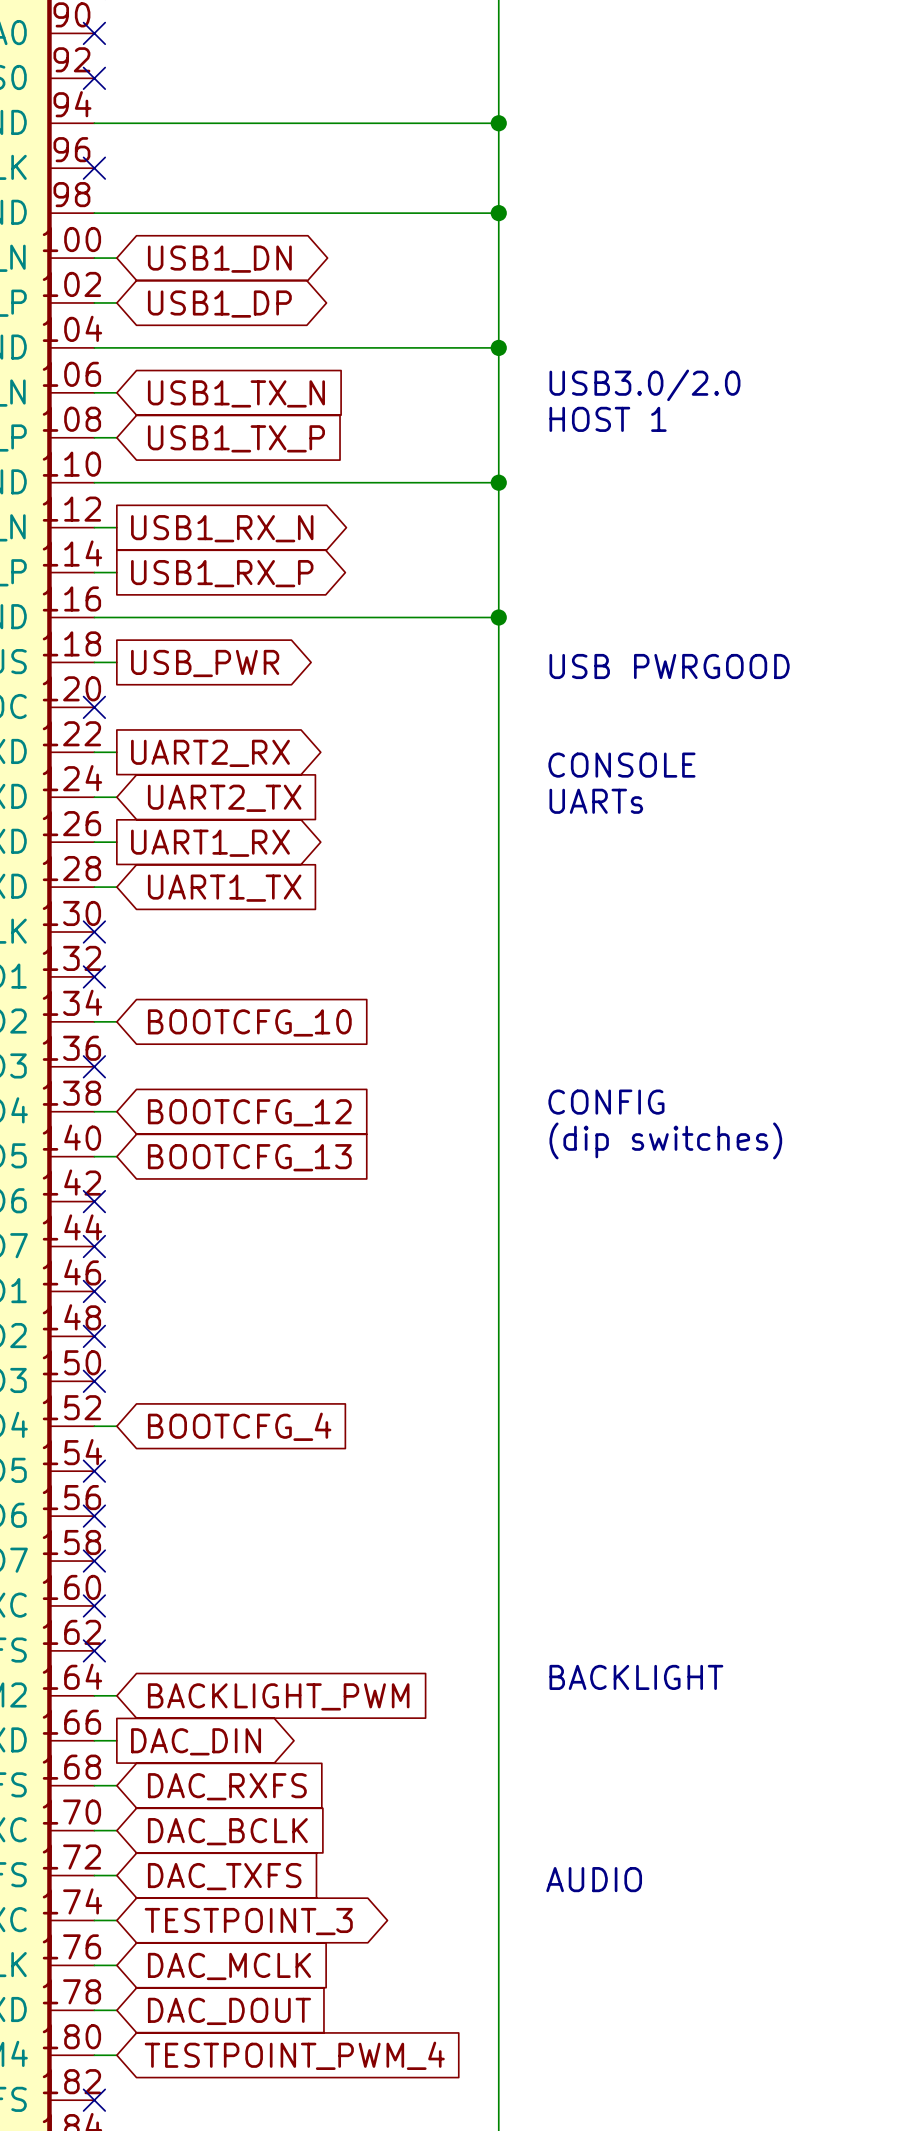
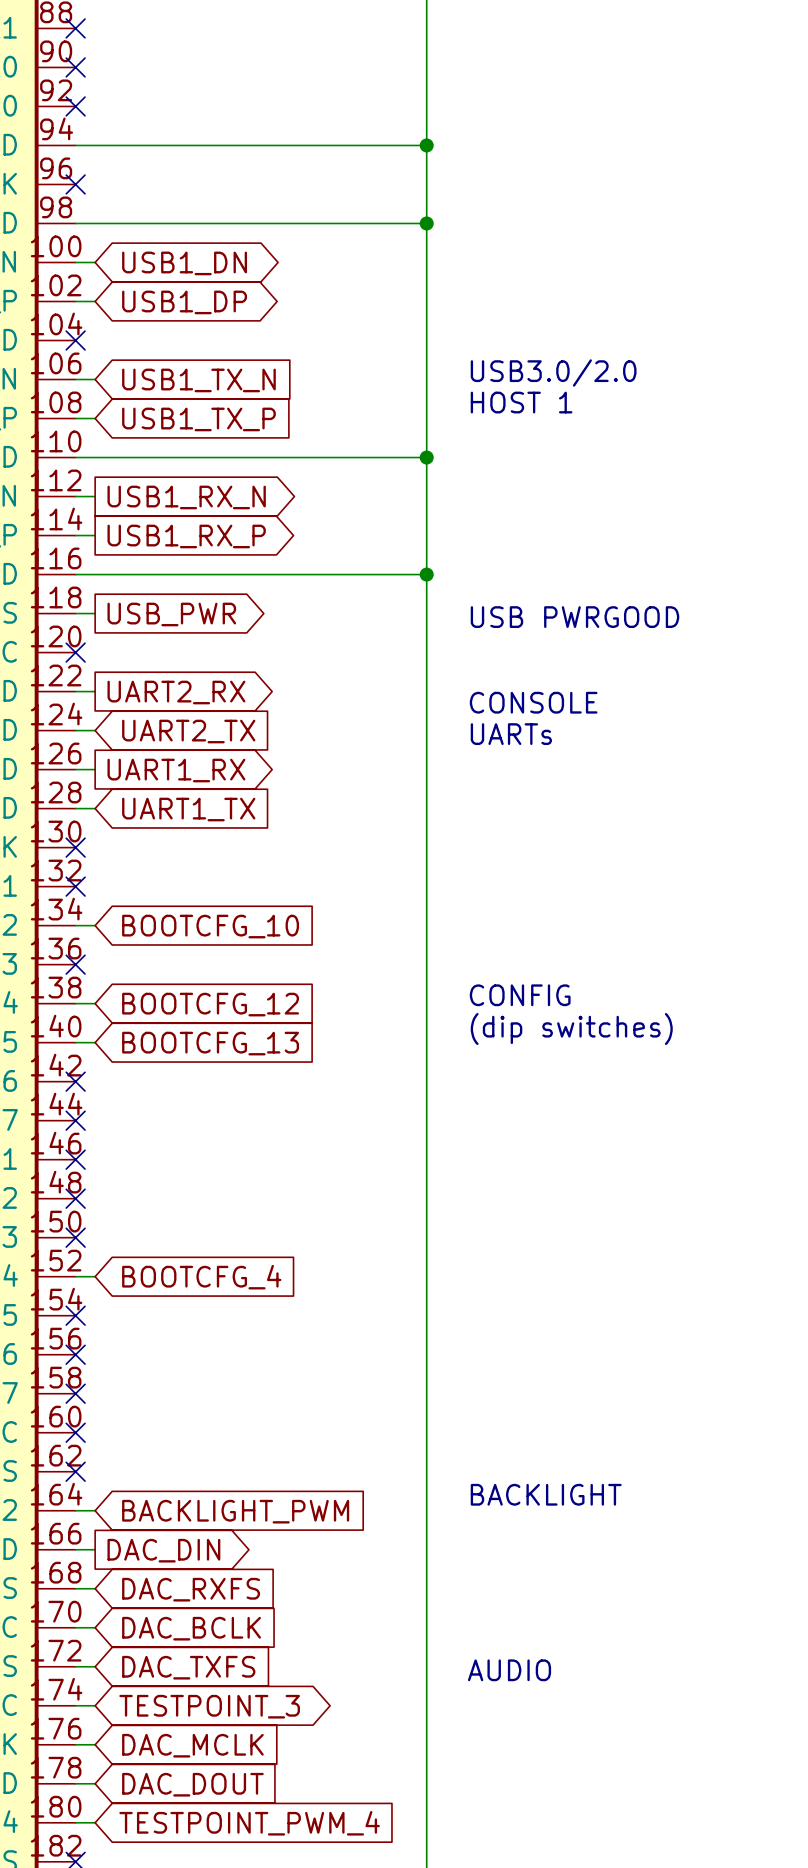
wire: (94, 347) (498, 347) -> none
no-connect mark: none -> (75, 340)
junction: (498, 347) -> none

